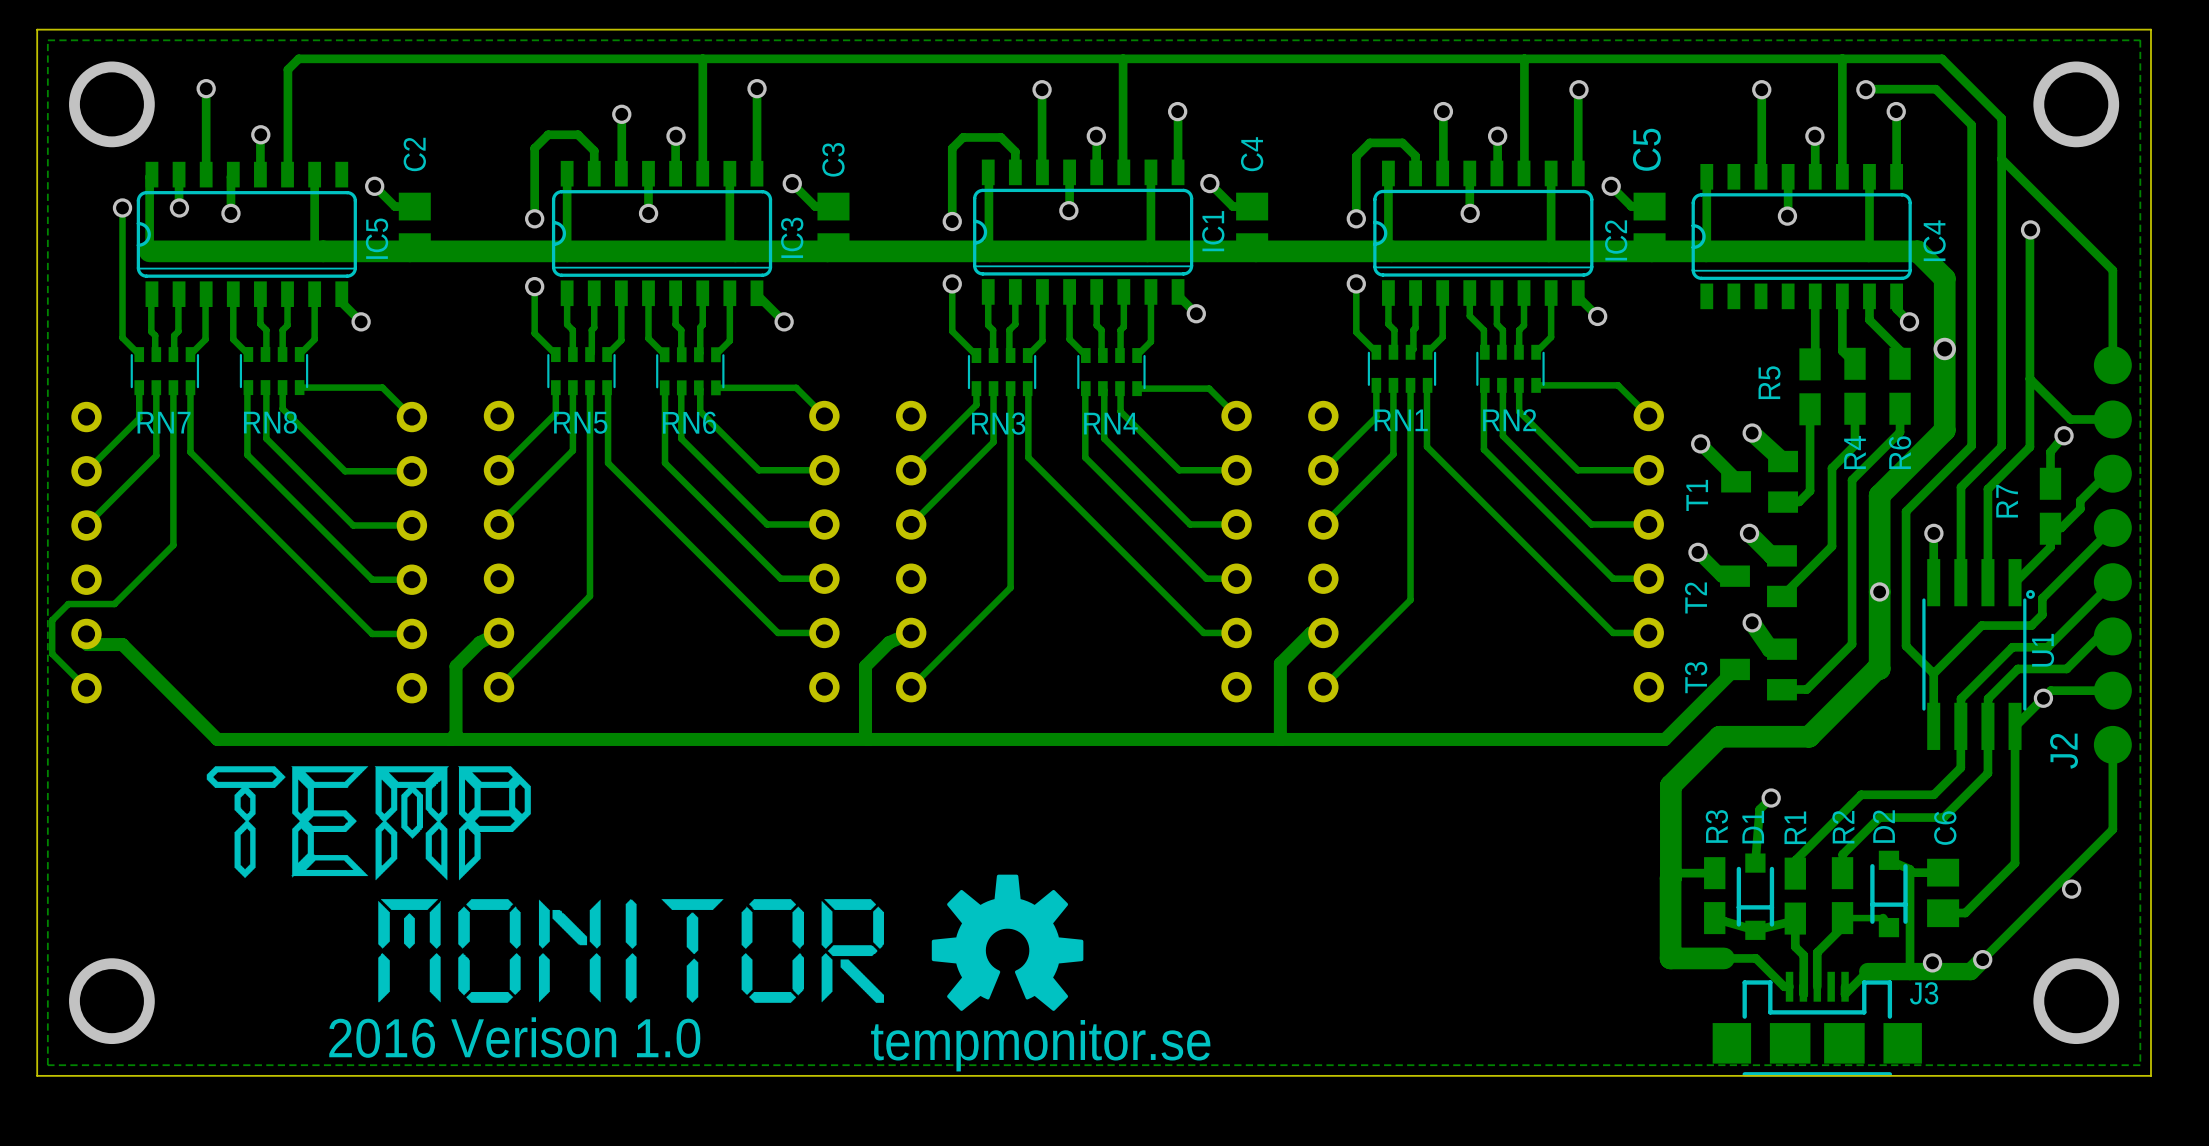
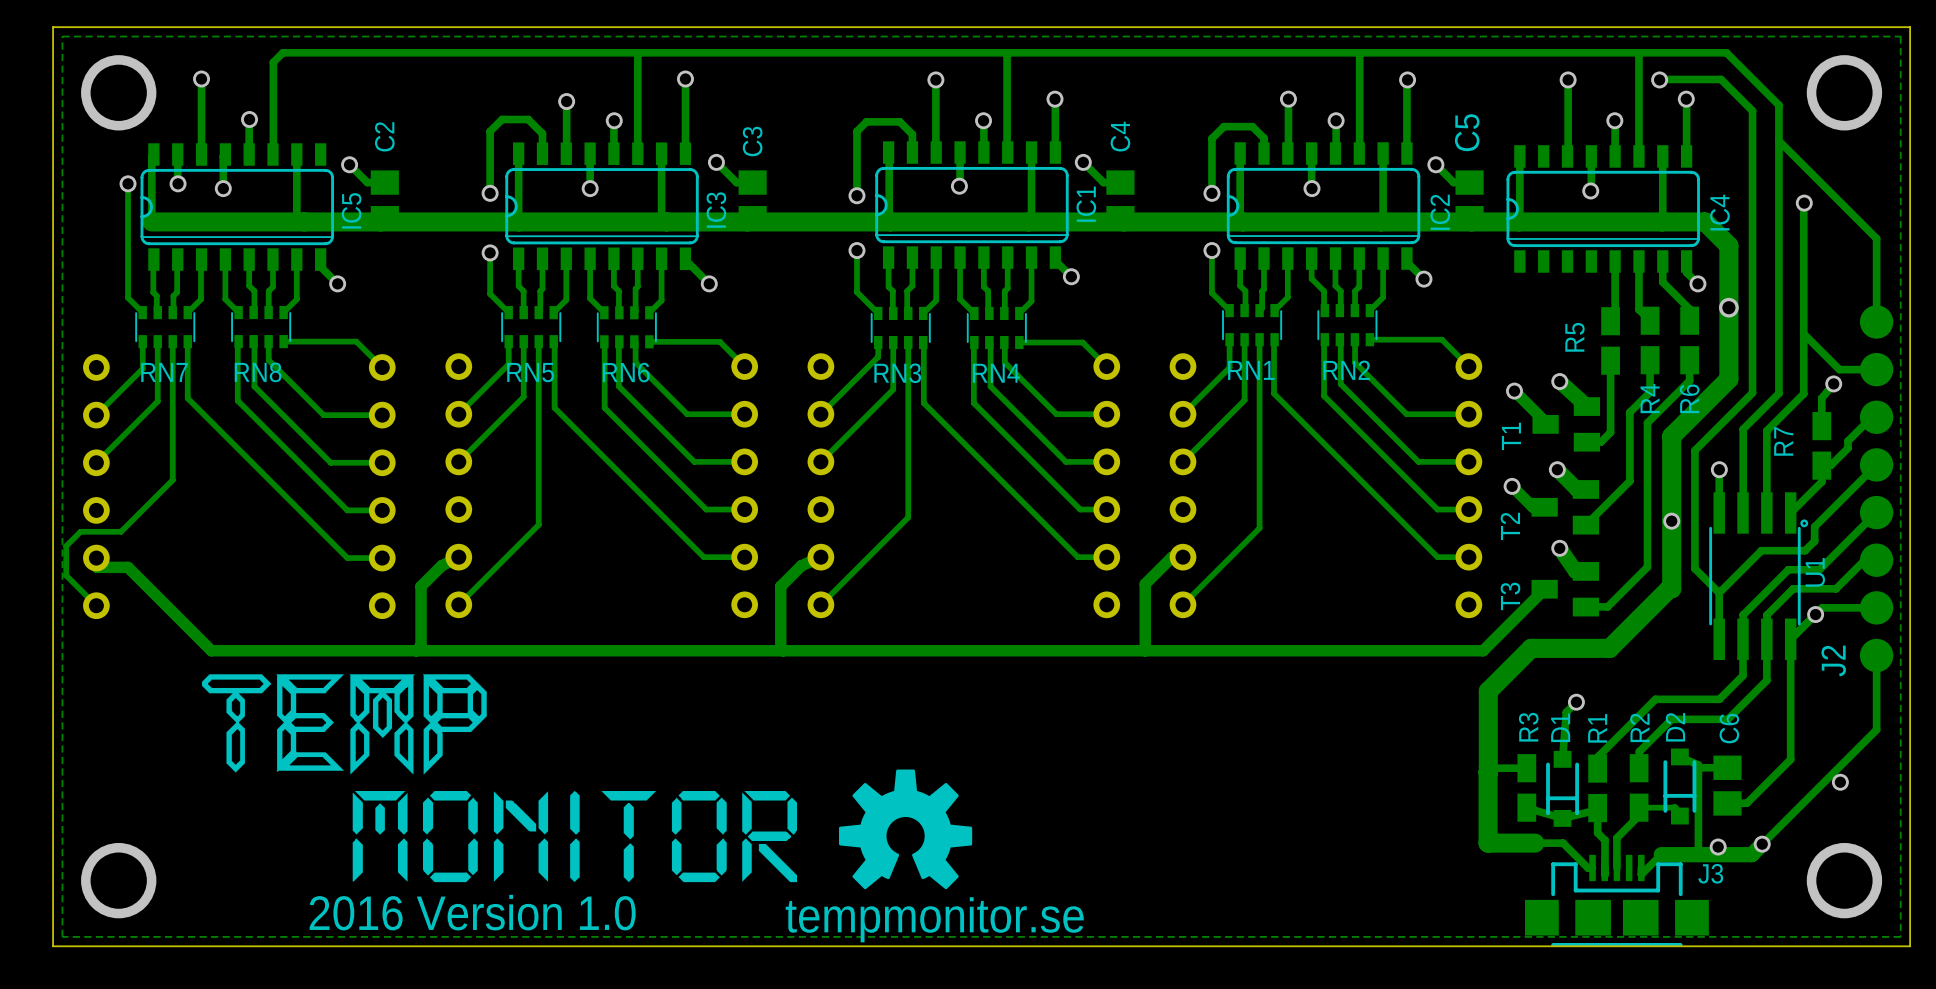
text: 2016 Verison 1.0 (514, 1037) -> 2016 Version 1.0 (472, 912)

